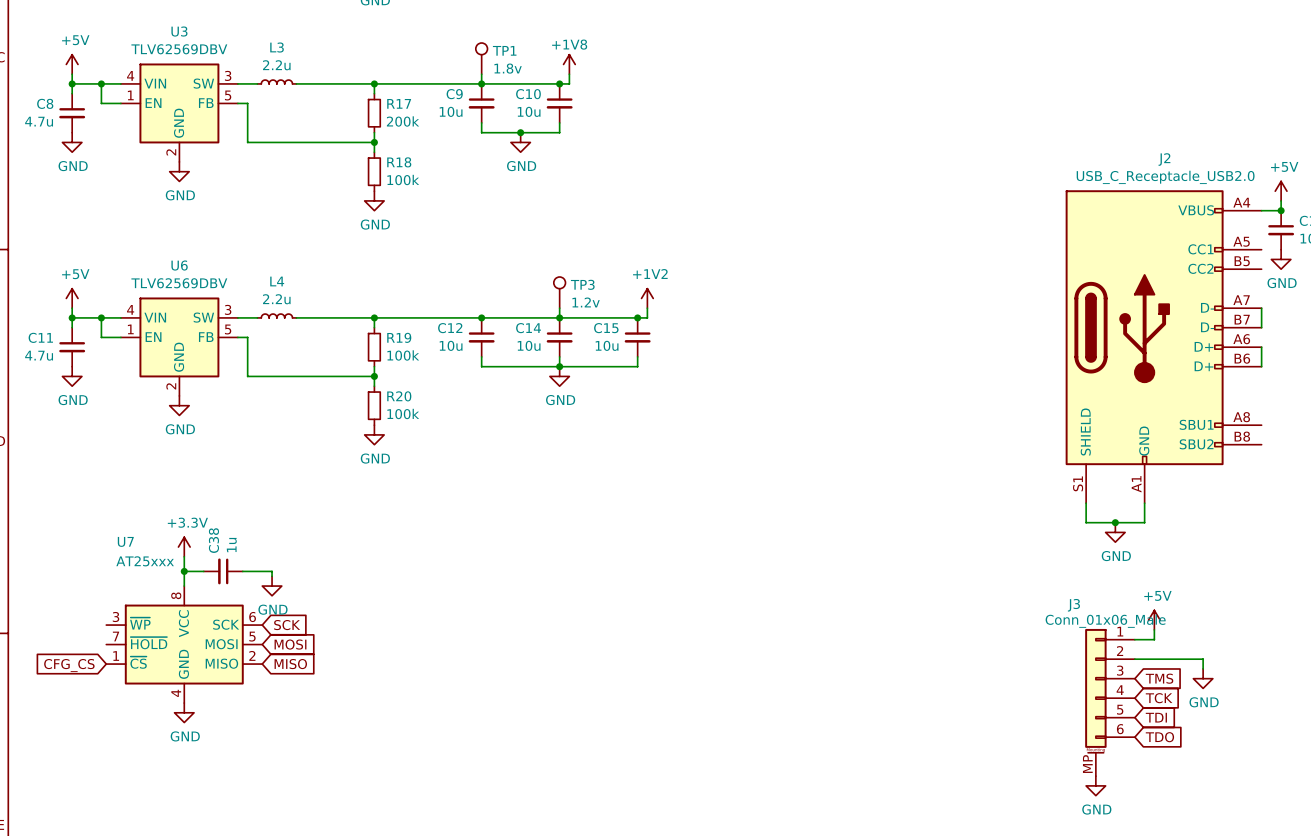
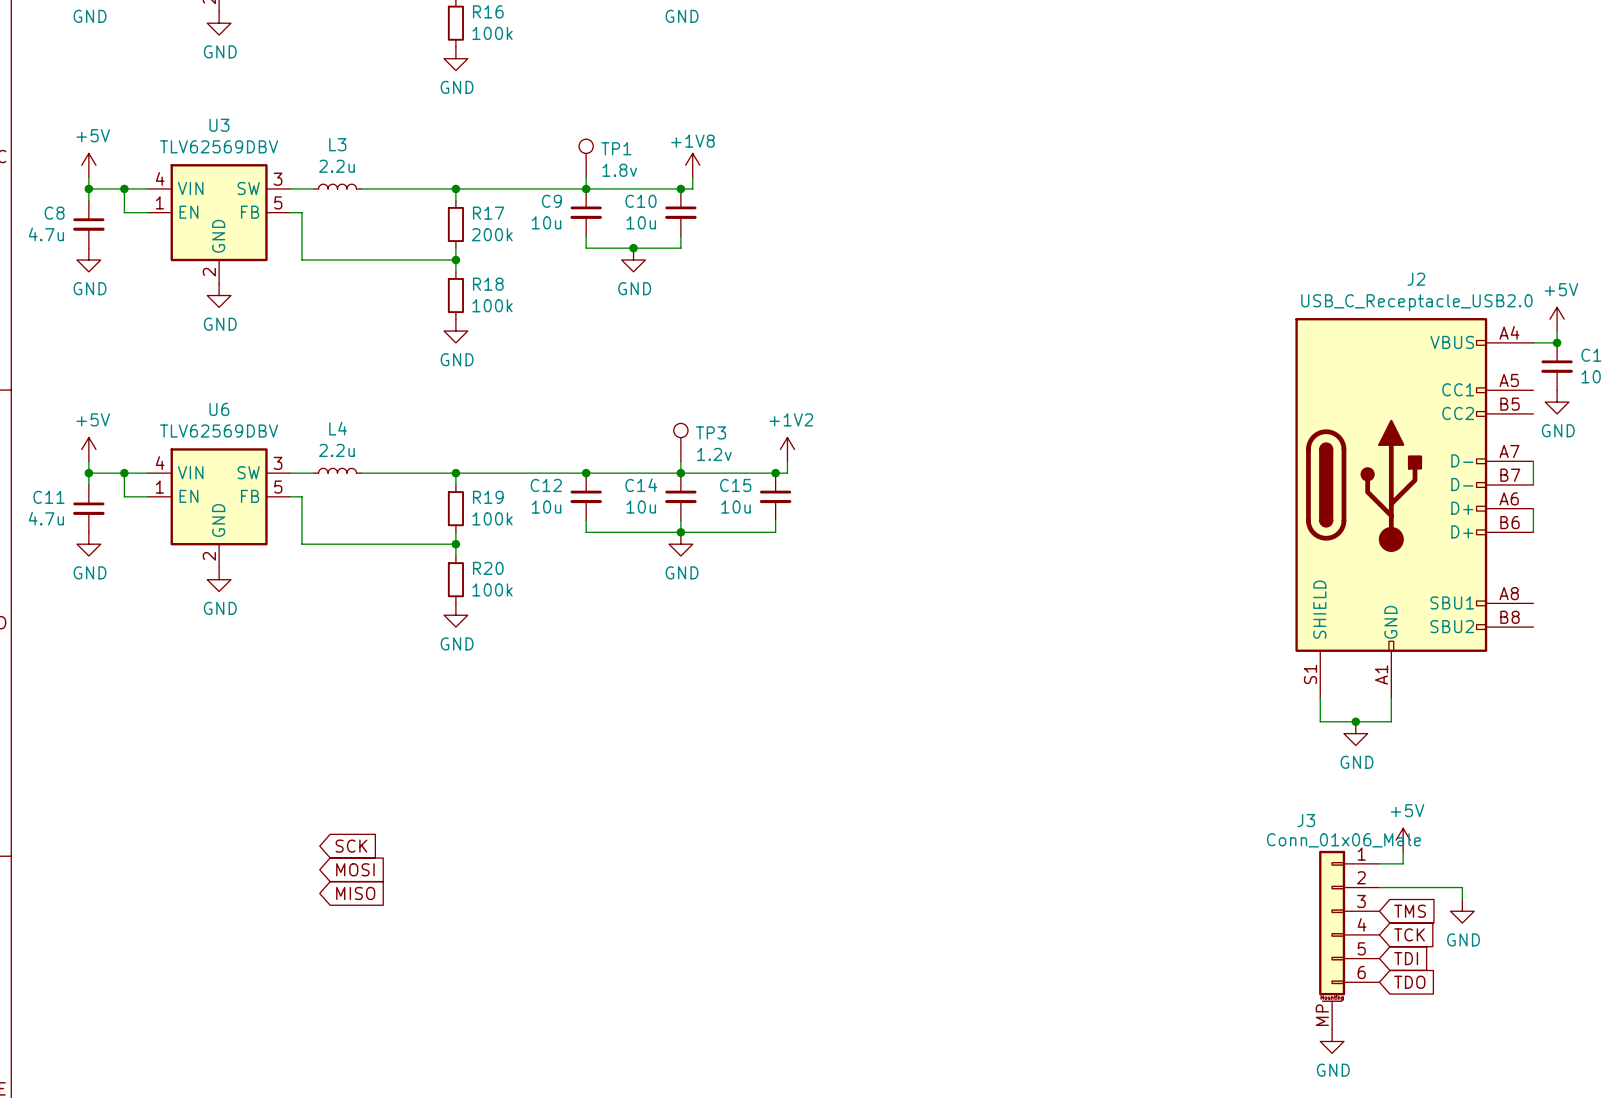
power symbol: +3.3V (184, 547) -> none
wire: (184, 556) (184, 586) -> none
wire: (184, 571) (203, 571) -> none
junction: (184, 571) -> none
C38: 1u (223, 571) -> none
wire: (242, 571) (272, 571) (272, 576) -> none
power symbol: GND (272, 586) -> none
U7: AT25xxx (184, 644) -> none
global label: CFG_CS (69, 665) -> none
power symbol: GND (184, 712) -> none

